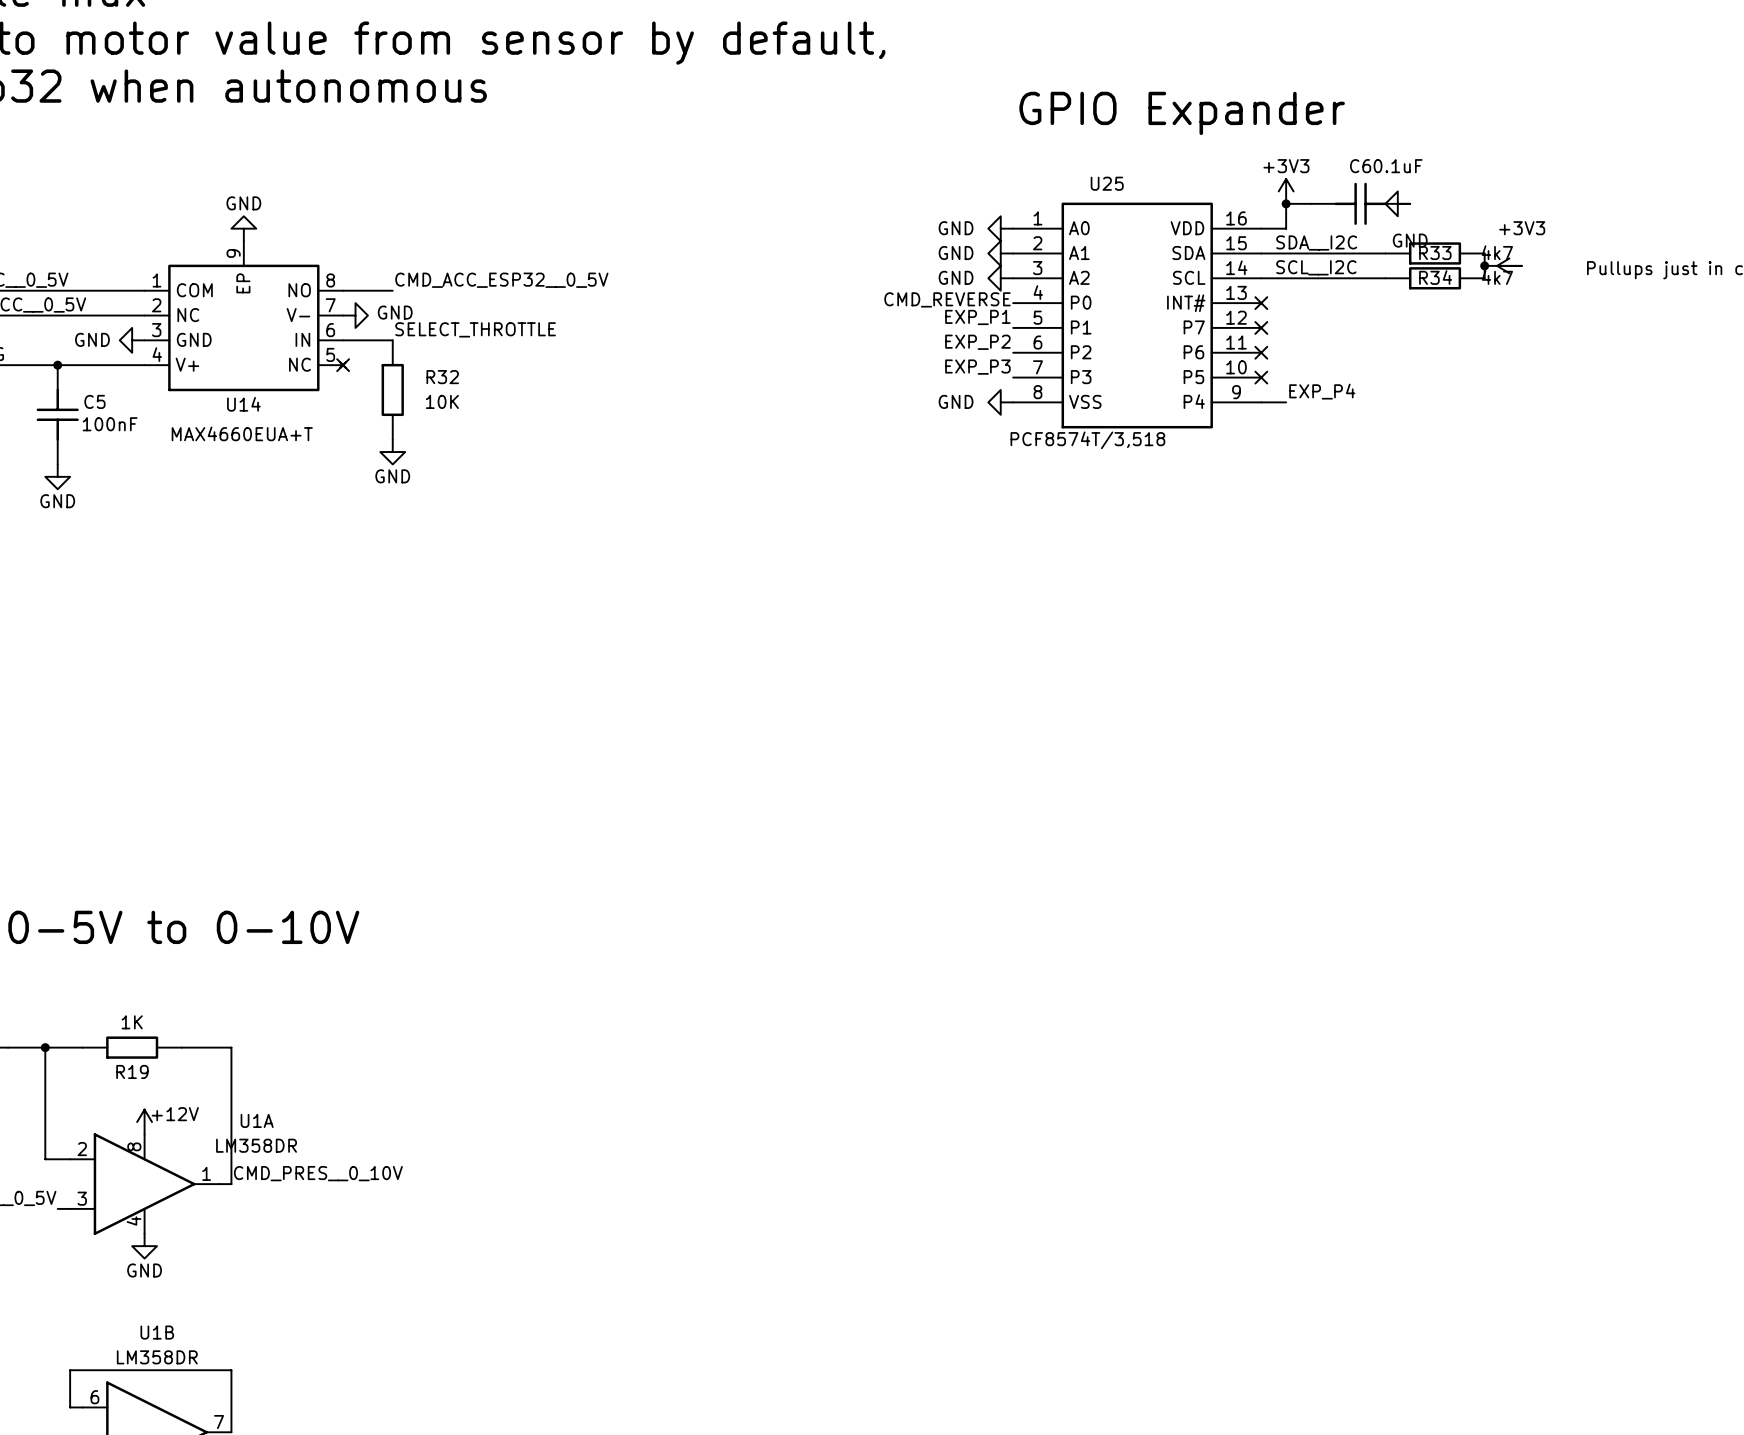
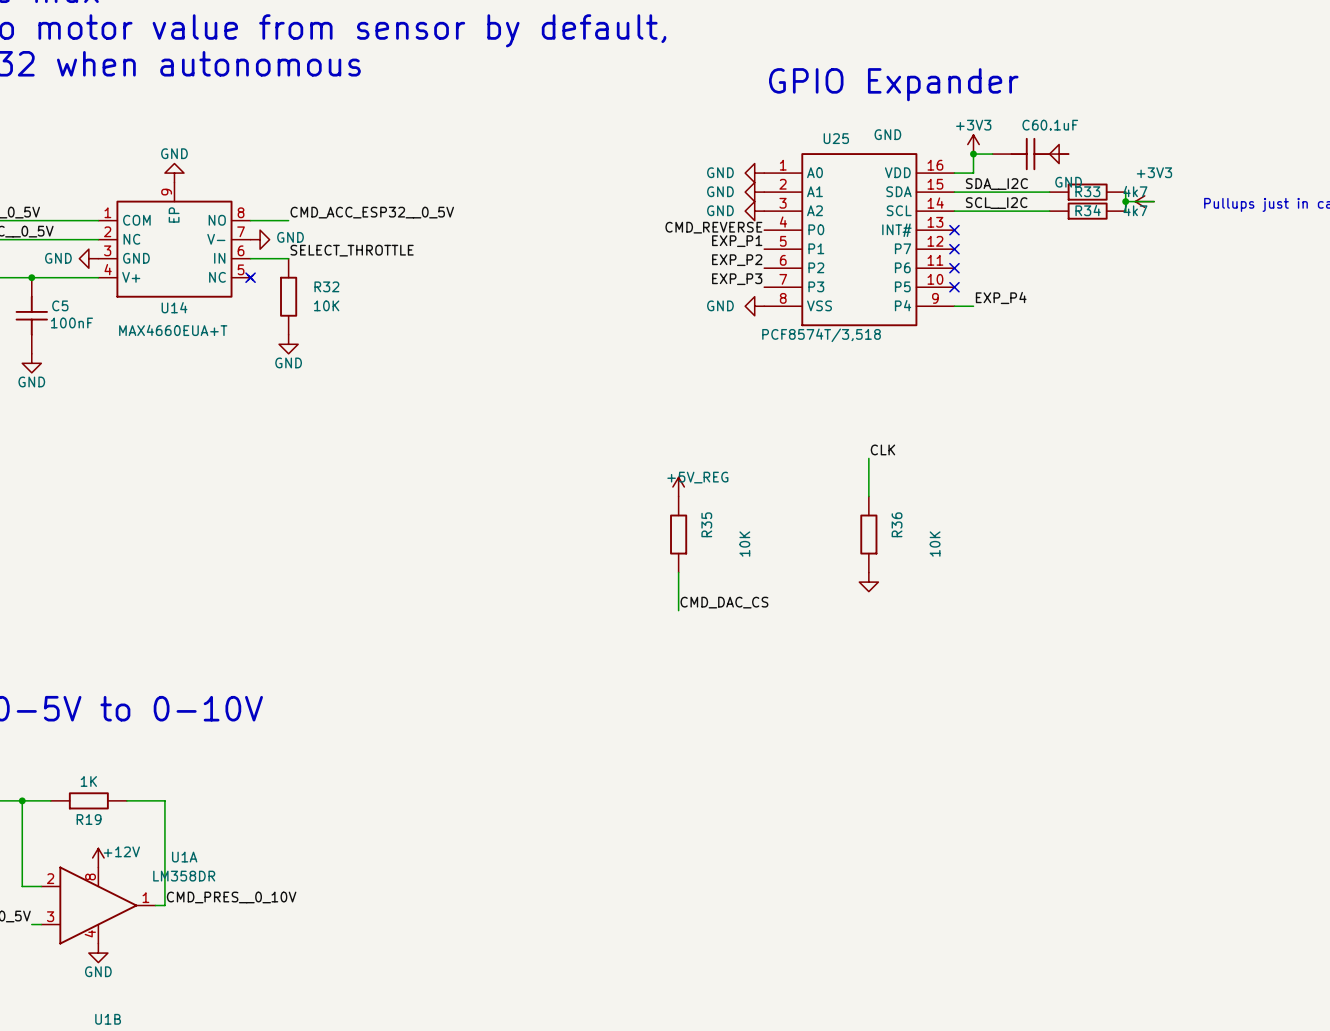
label: none -> CLK (882, 449)
wire: none -> (868, 458) (868, 496)
power symbol: none -> +5V_REG (678, 486)
R35: none -> 10K (678, 534)
R36: none -> 10K (868, 534)
wire: none -> (678, 572) (678, 610)
power symbol: none -> GND (868, 582)
label: none -> CMD_DAC_CS (724, 602)

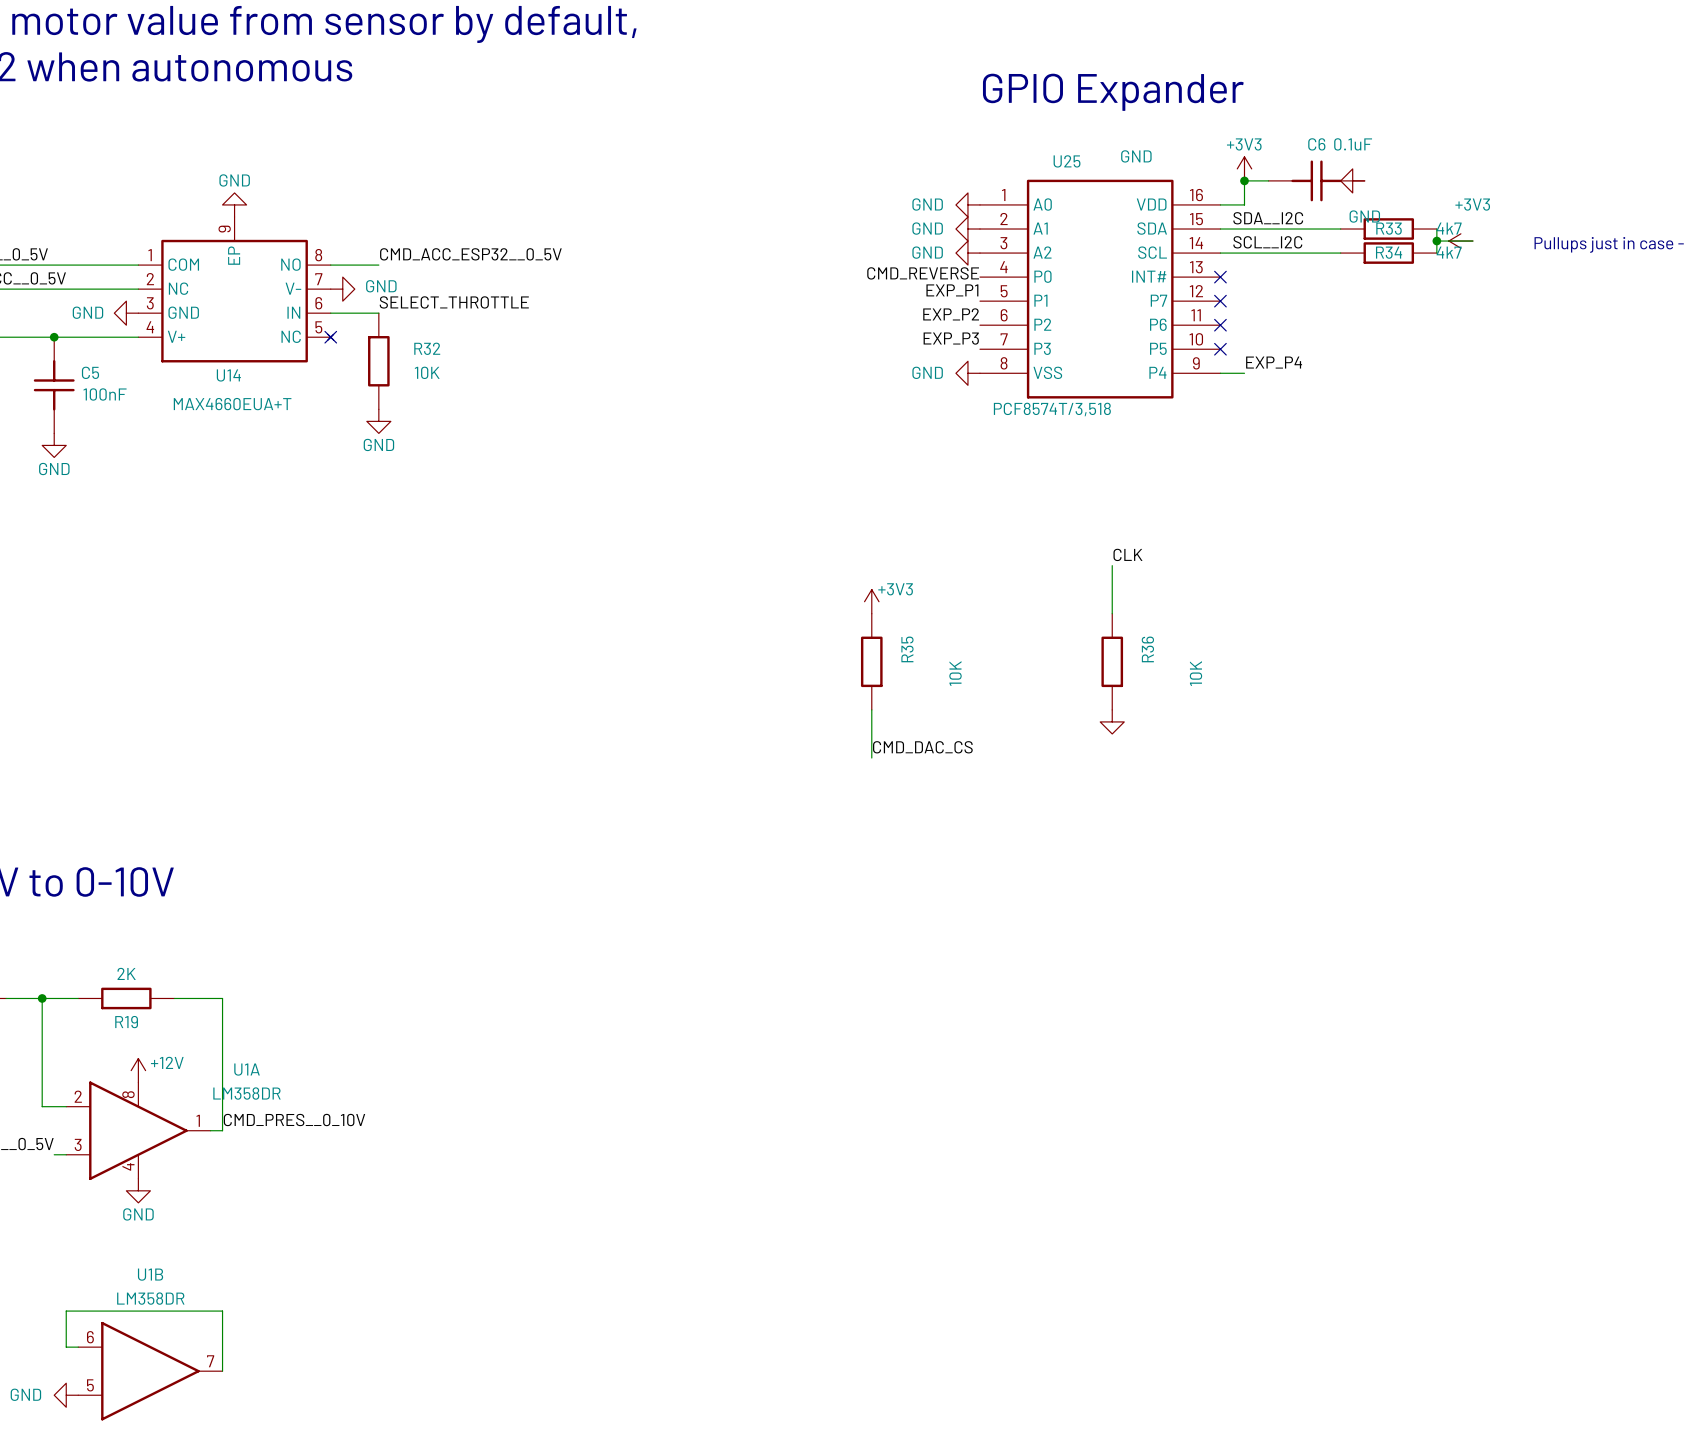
power symbol: +5V_REG (678, 486) -> +3V3 (871, 601)
R19 value: 1K (88, 781) -> 2K (126, 973)

